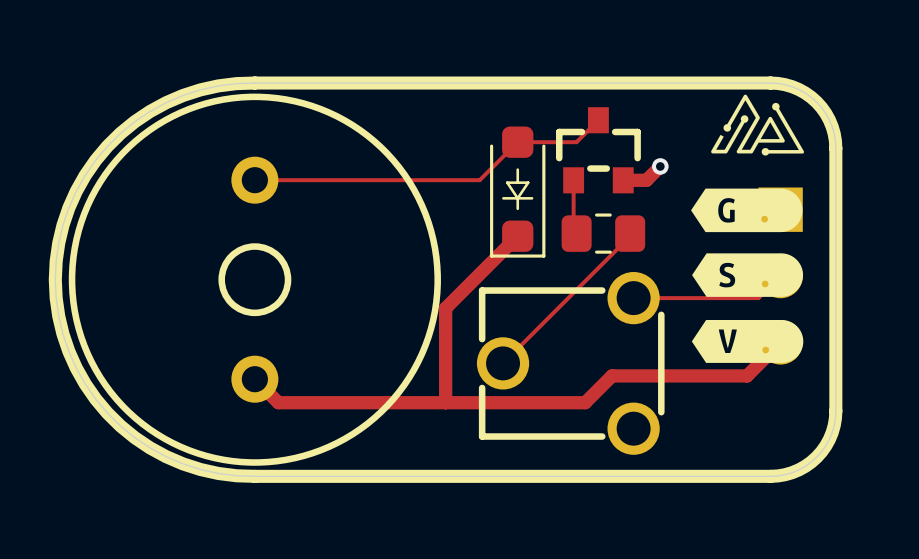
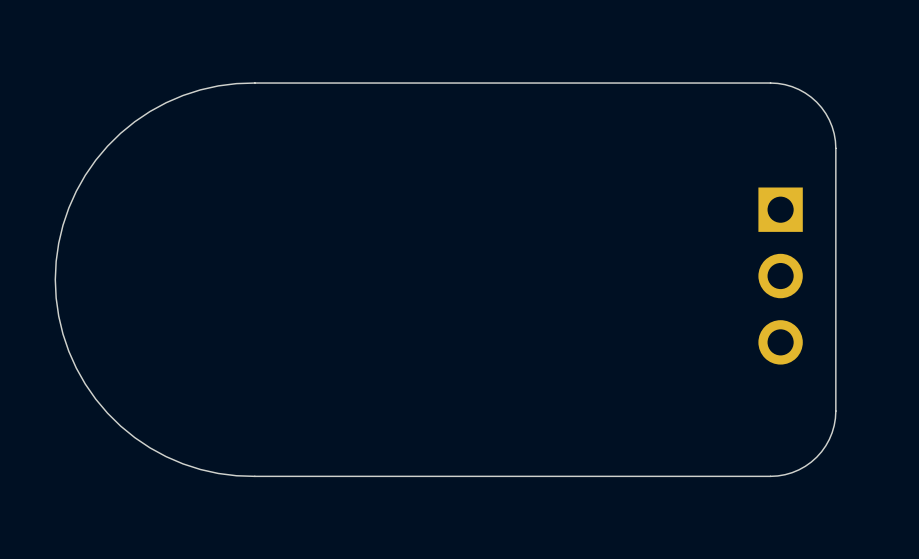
line: (254, 83) (770, 83) (785, 84) (805, 93) (816, 102) (825, 113) (832, 126) (835, 141) (835, 411) (832, 432) (825, 445) (816, 457) (798, 469) (785, 474) (770, 476) (236, 475) (218, 473) (183, 463) (150, 447) (120, 426) (95, 399) (76, 368) (68, 351) (58, 316) (55, 279) (58, 243) (62, 225) (68, 208) (85, 175) (107, 146) (134, 121) (166, 102) (200, 89) (236, 83) (254, 83) -> none
drawing: [711, 94, 804, 156] -> none
top track: (598, 120) (576, 142) (517, 142) (479, 180) (254, 180) -> none
part: (598, 150) -> none
top track: (660, 166) (646, 180) (623, 180) -> none
via: (660, 166) -> none
top track: (573, 180) (573, 230) (576, 233) -> none
drawing: [691, 188, 804, 363] -> none
part: (517, 192) -> none
part: (603, 233) -> none
top track: (630, 233) (630, 236) (503, 363) -> none
top track: (517, 236) (445, 308) (445, 402) -> none
top track: (780, 276) (758, 298) (633, 298) -> none
part: (254, 279) -> none
top track: (780, 342) (747, 375) (612, 375) (585, 402) (278, 402) (254, 379) -> none
part: (570, 363) -> none

